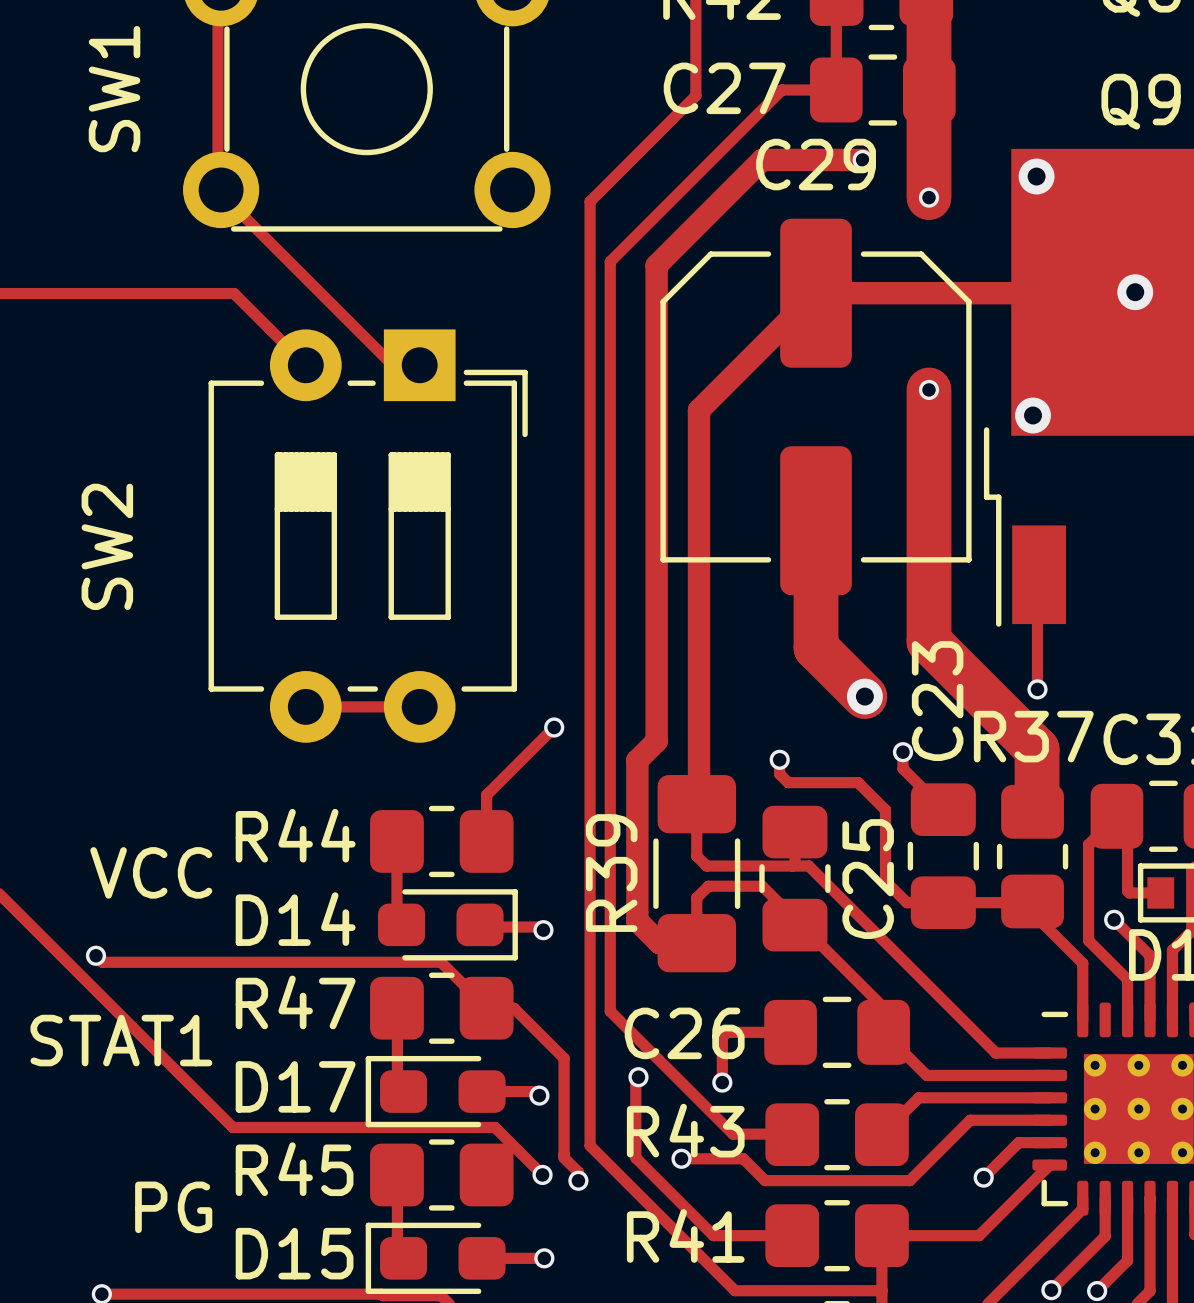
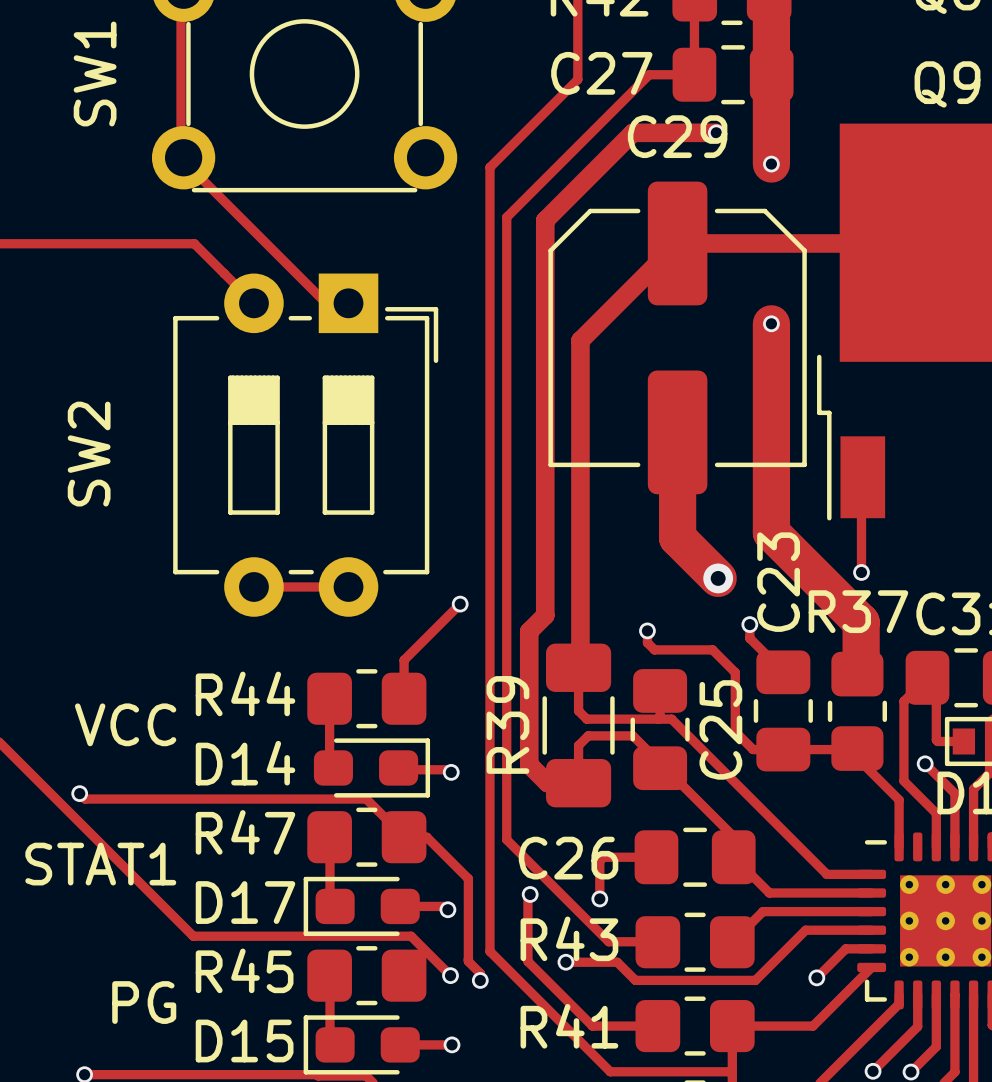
via: (1036, 176) -> none
via: (1135, 292) -> none
via: (1033, 415) -> none

